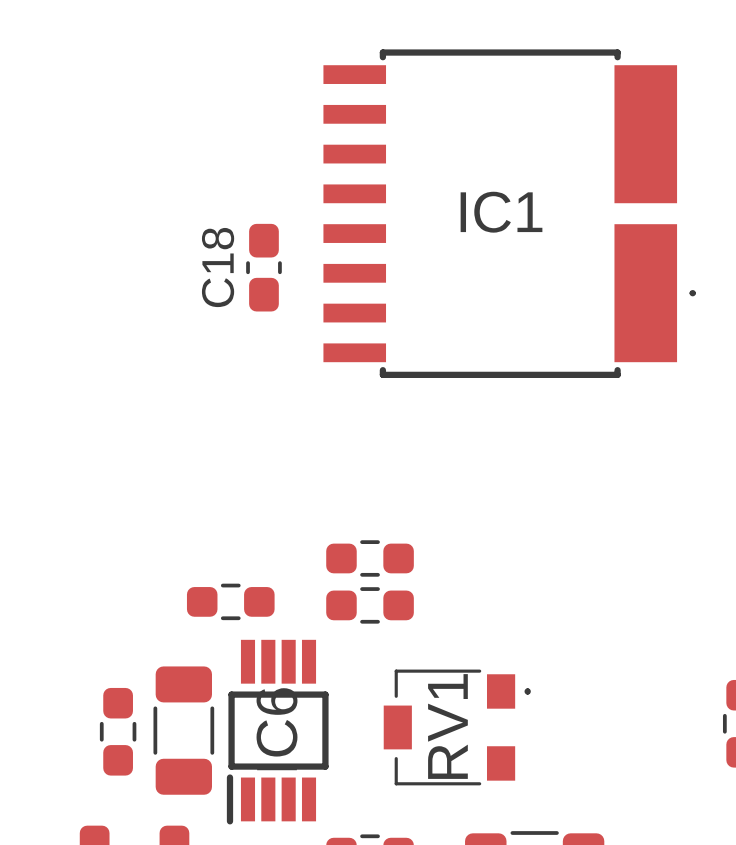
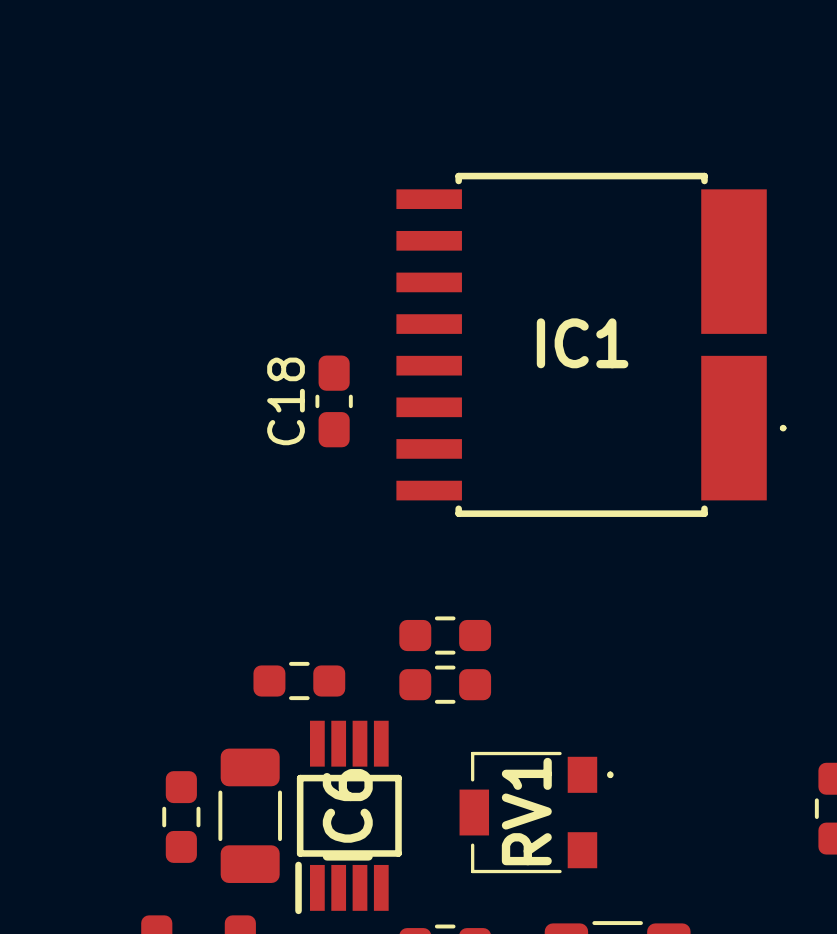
IC1 position: (509, 213) -> (591, 344)
C18 position: (263, 267) -> (334, 401)

